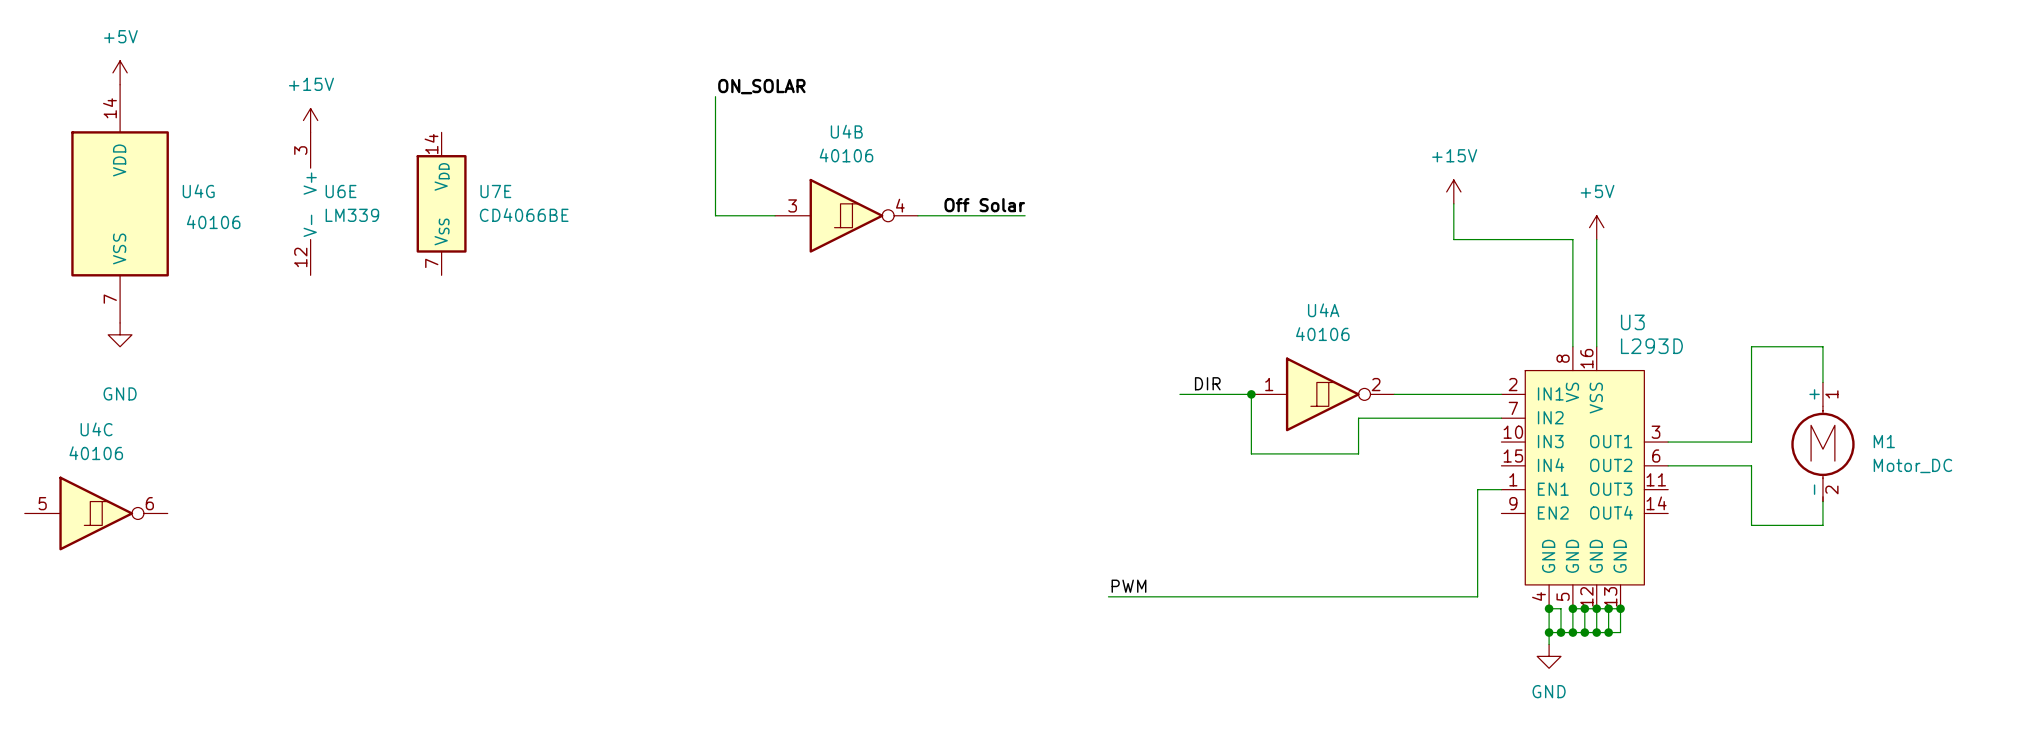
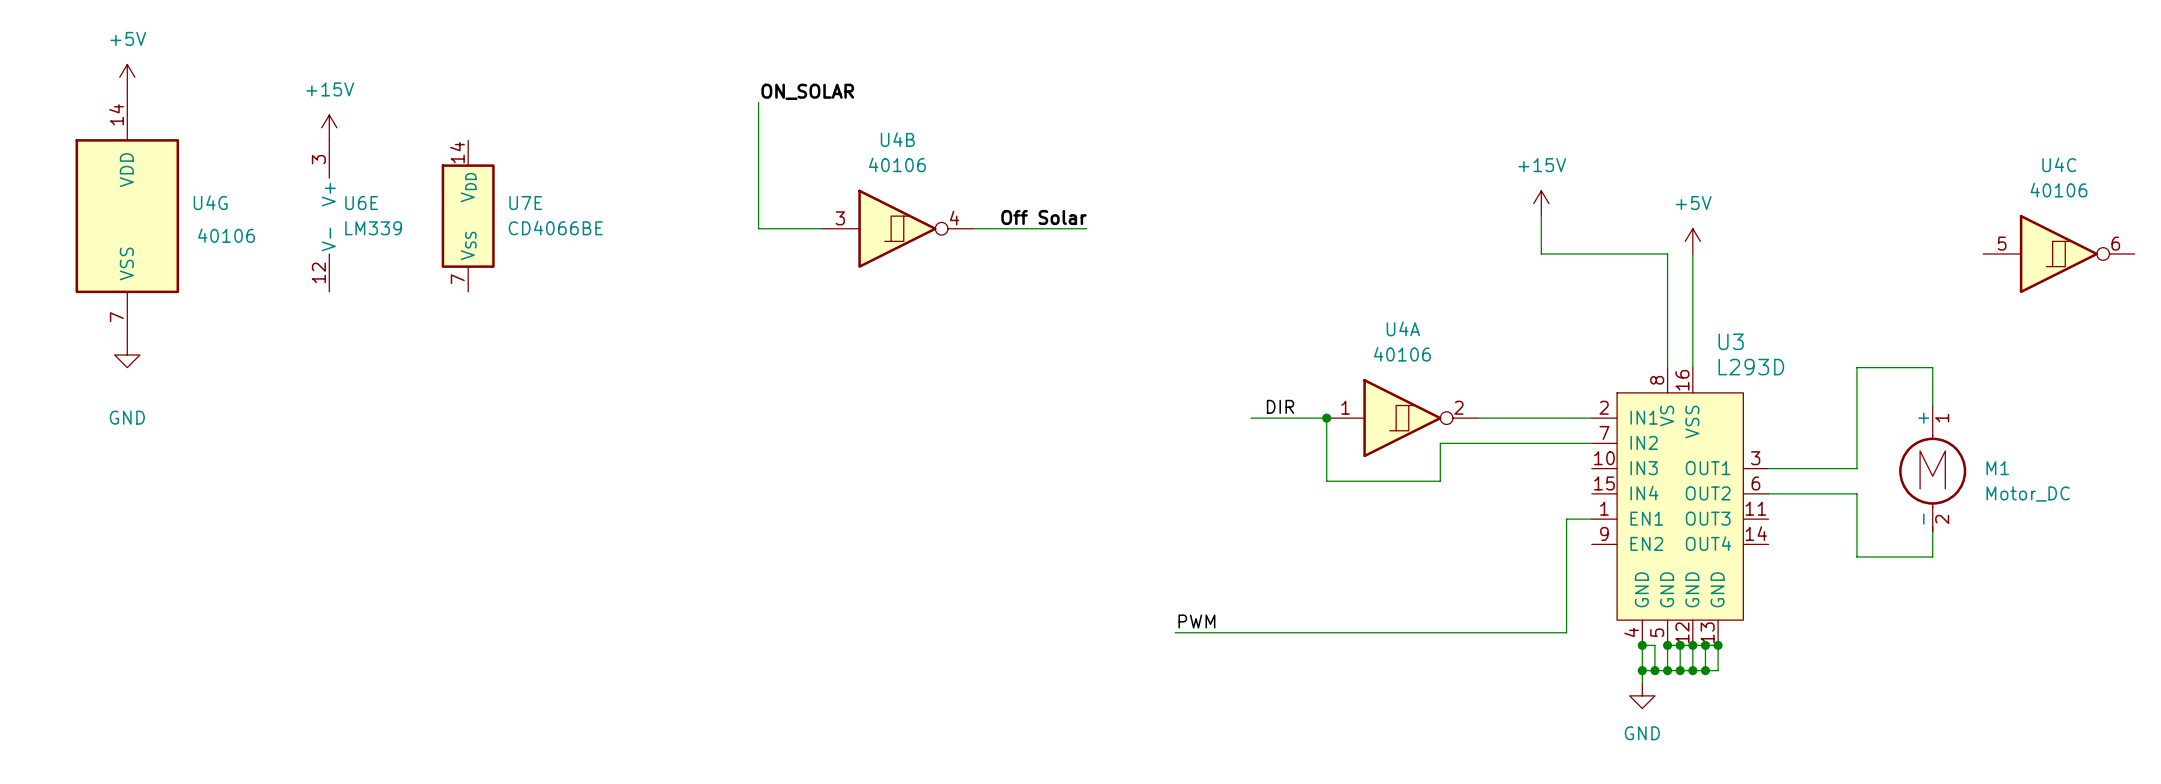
U4C position: (96, 513) -> (2058, 254)

